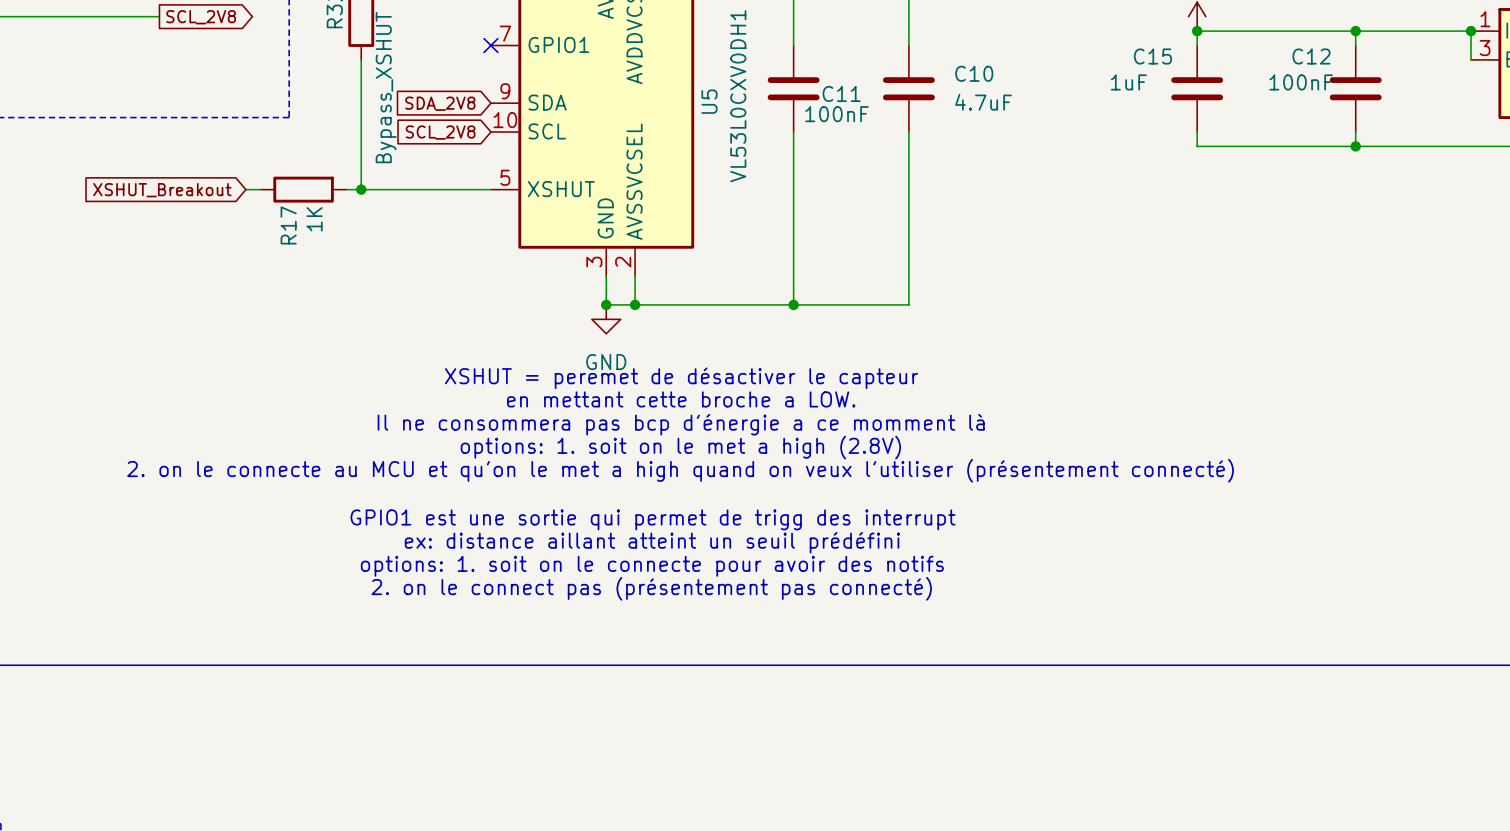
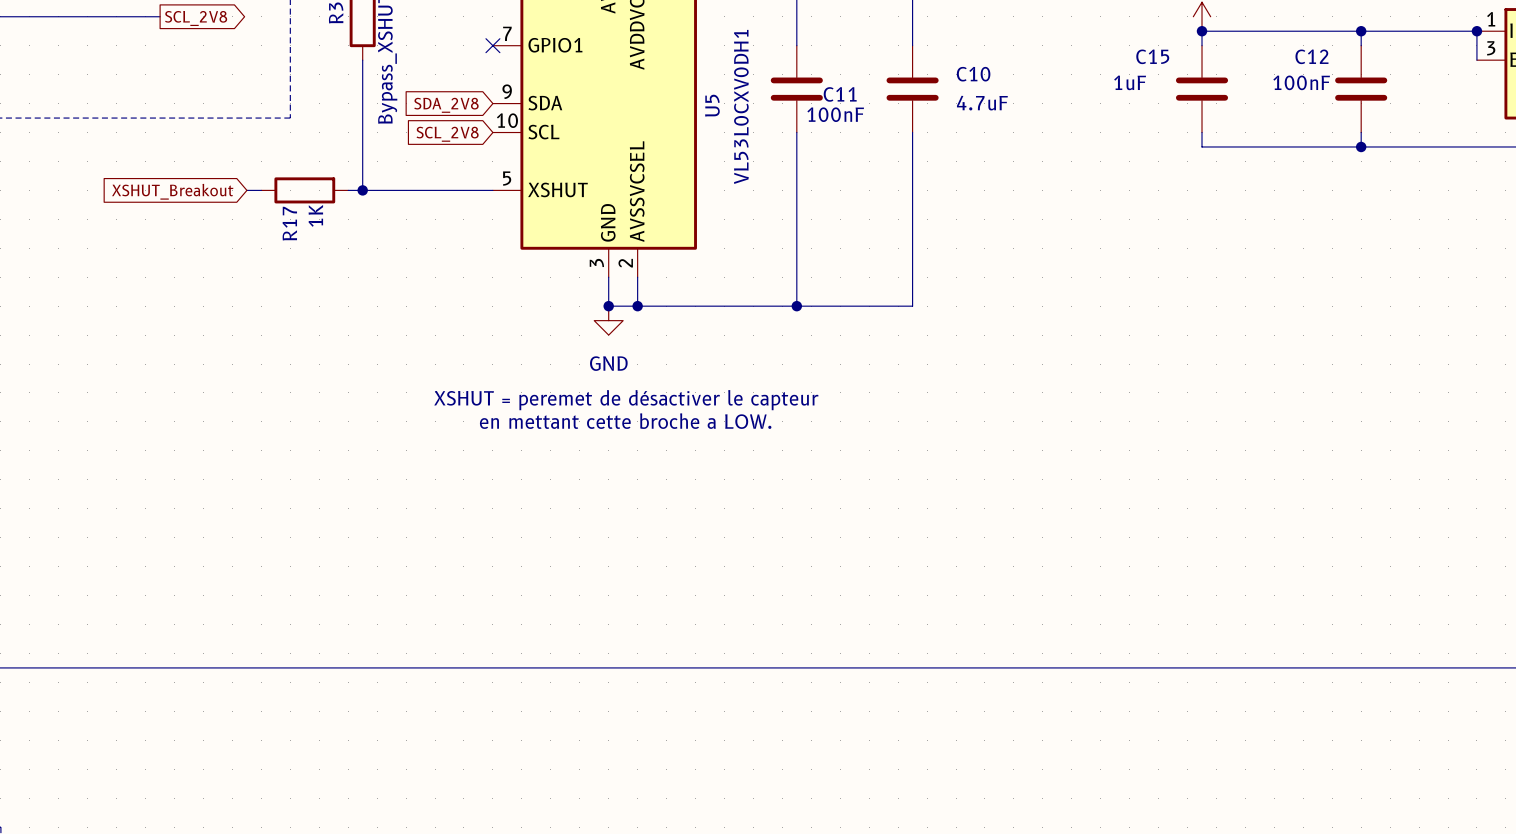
text position: XSHUT = peremet de désactiver le capteur (681, 378) -> XSHUT = peremet de désactiver le capteur (626, 400)
text position: en mettant cette broche a LOW. (681, 399) -> en mettant cette broche a LOW. (625, 421)
text: Il ne consommera pas bcp d'énergie a ce momment là (681, 424) -> none
text: options: 1. soit on le met a high (2.8V) (680, 447) -> none
text: 2. on le connecte au MCU et qu'on le met a high quand on veux l'utiliser (présentement connecté) (680, 470) -> none
text: GPIO1 est une sortie qui permet de trigg des interrupt (653, 519) -> none
text: ex: distance aillant atteint un seuil prédéfini (652, 542) -> none
text: options: 1. soit on le connecte pour avoir des notifs (652, 566) -> none
text: 2. on le connect pas (présentement pas connecté) (651, 588) -> none

